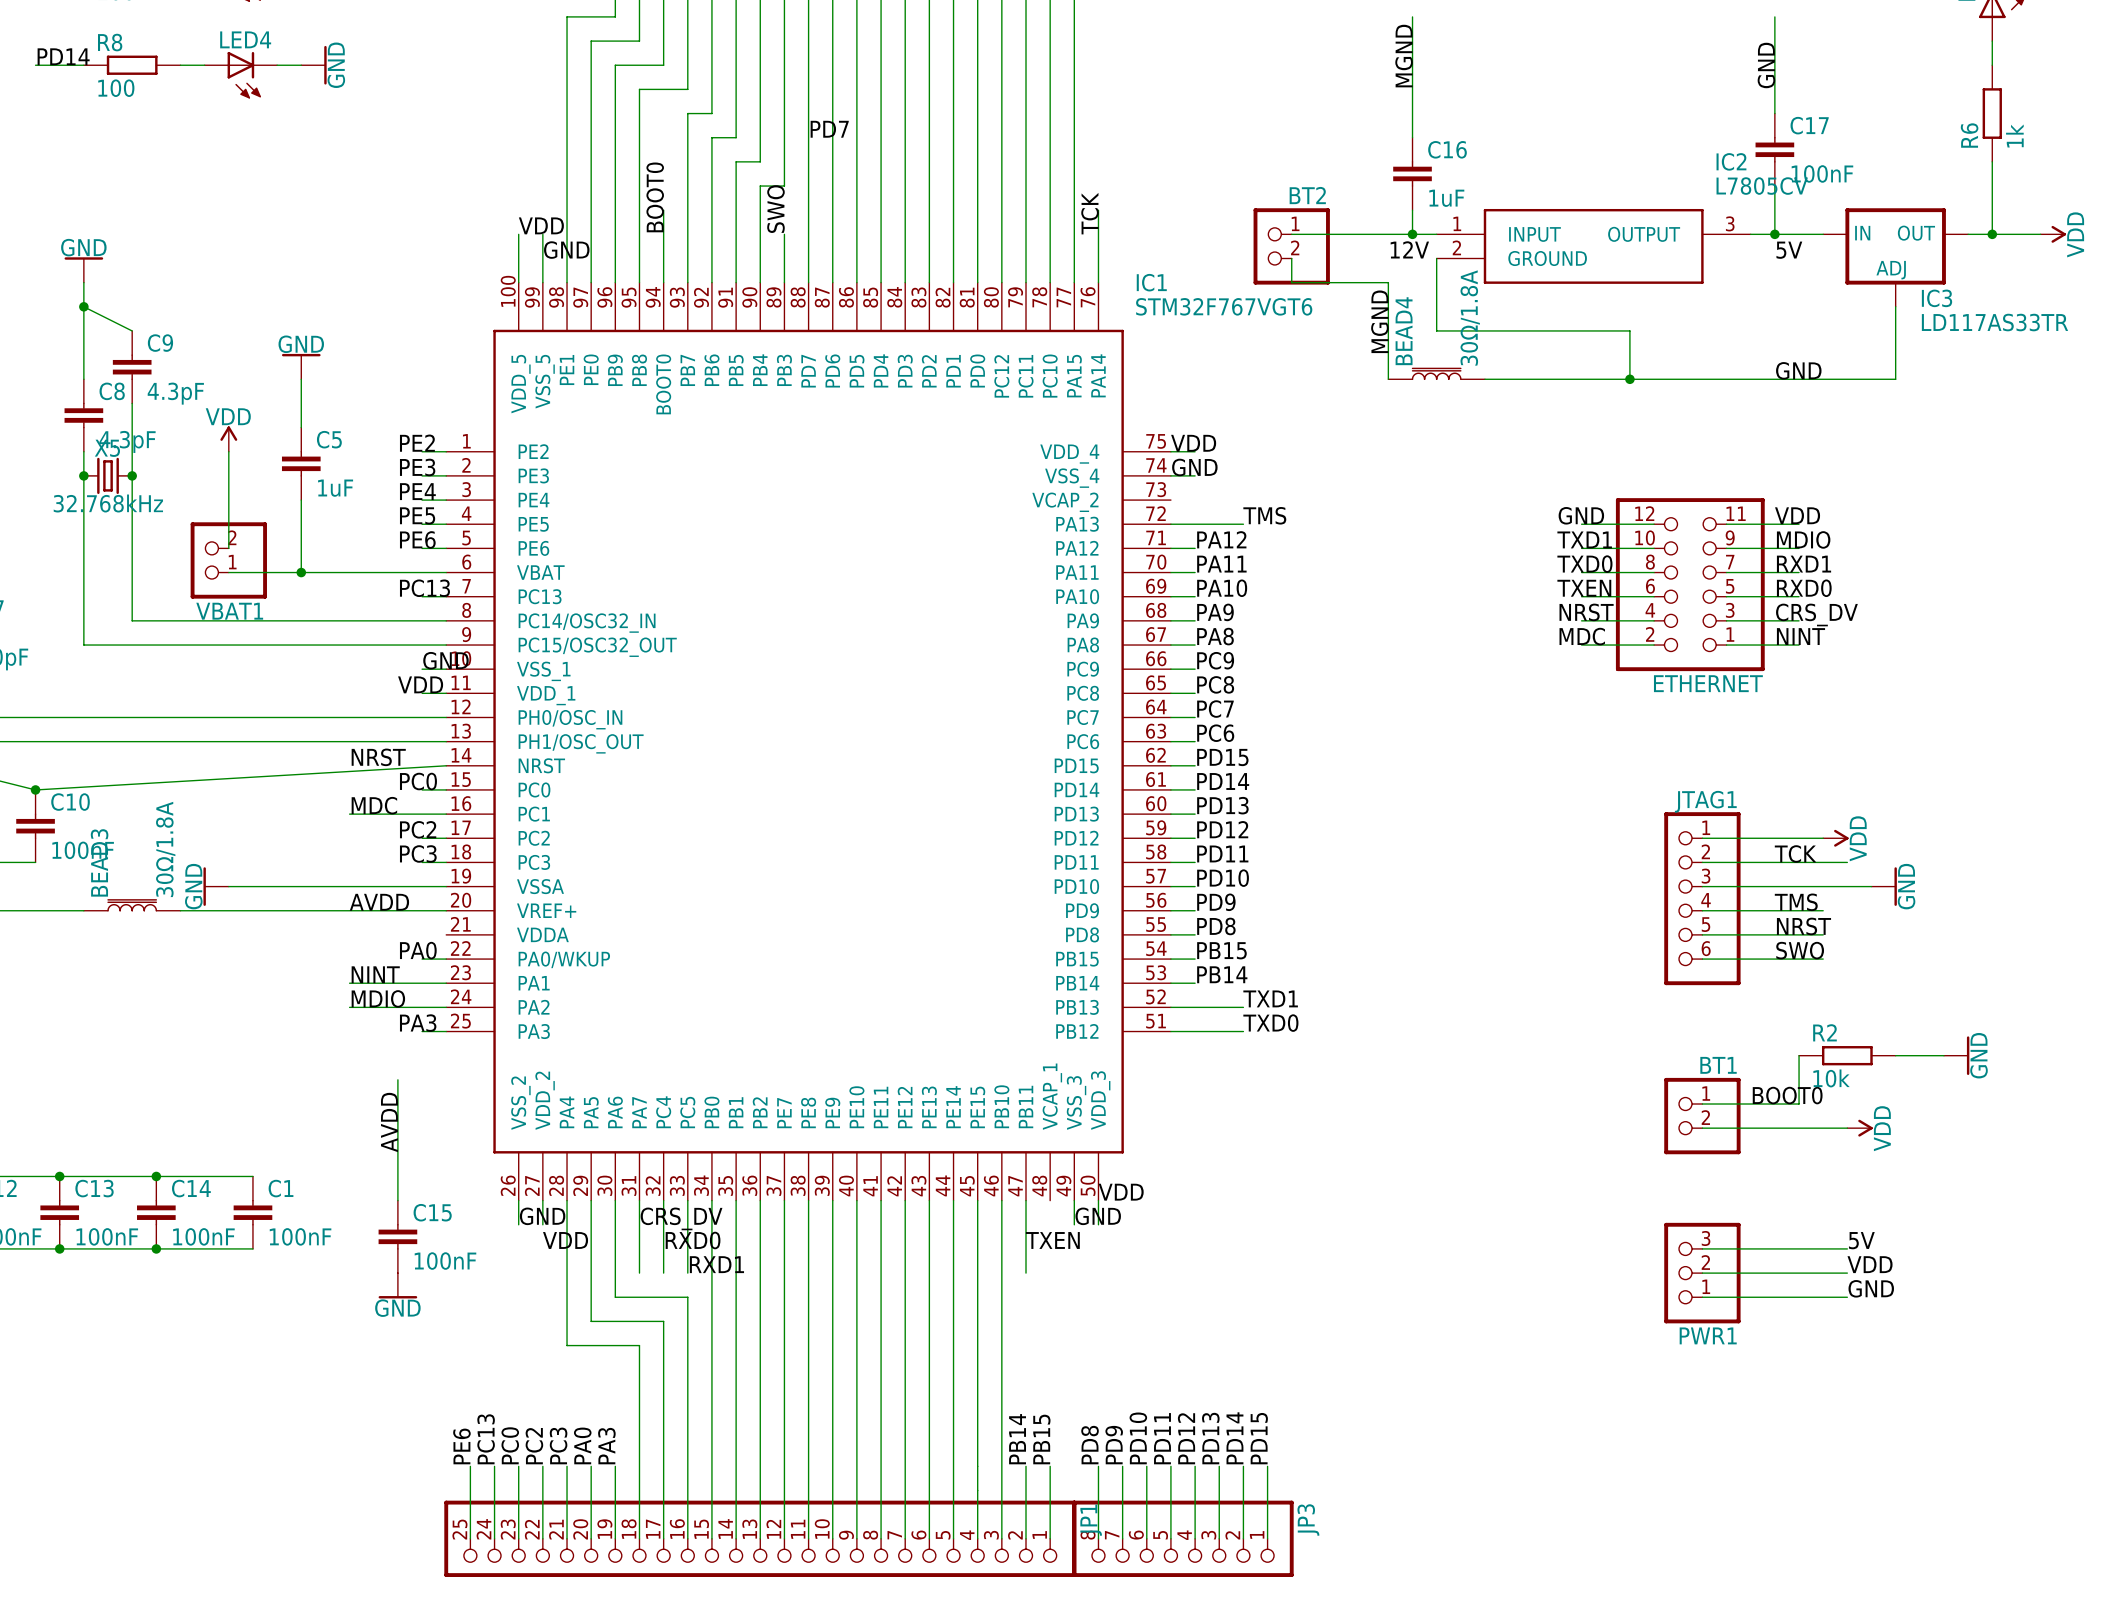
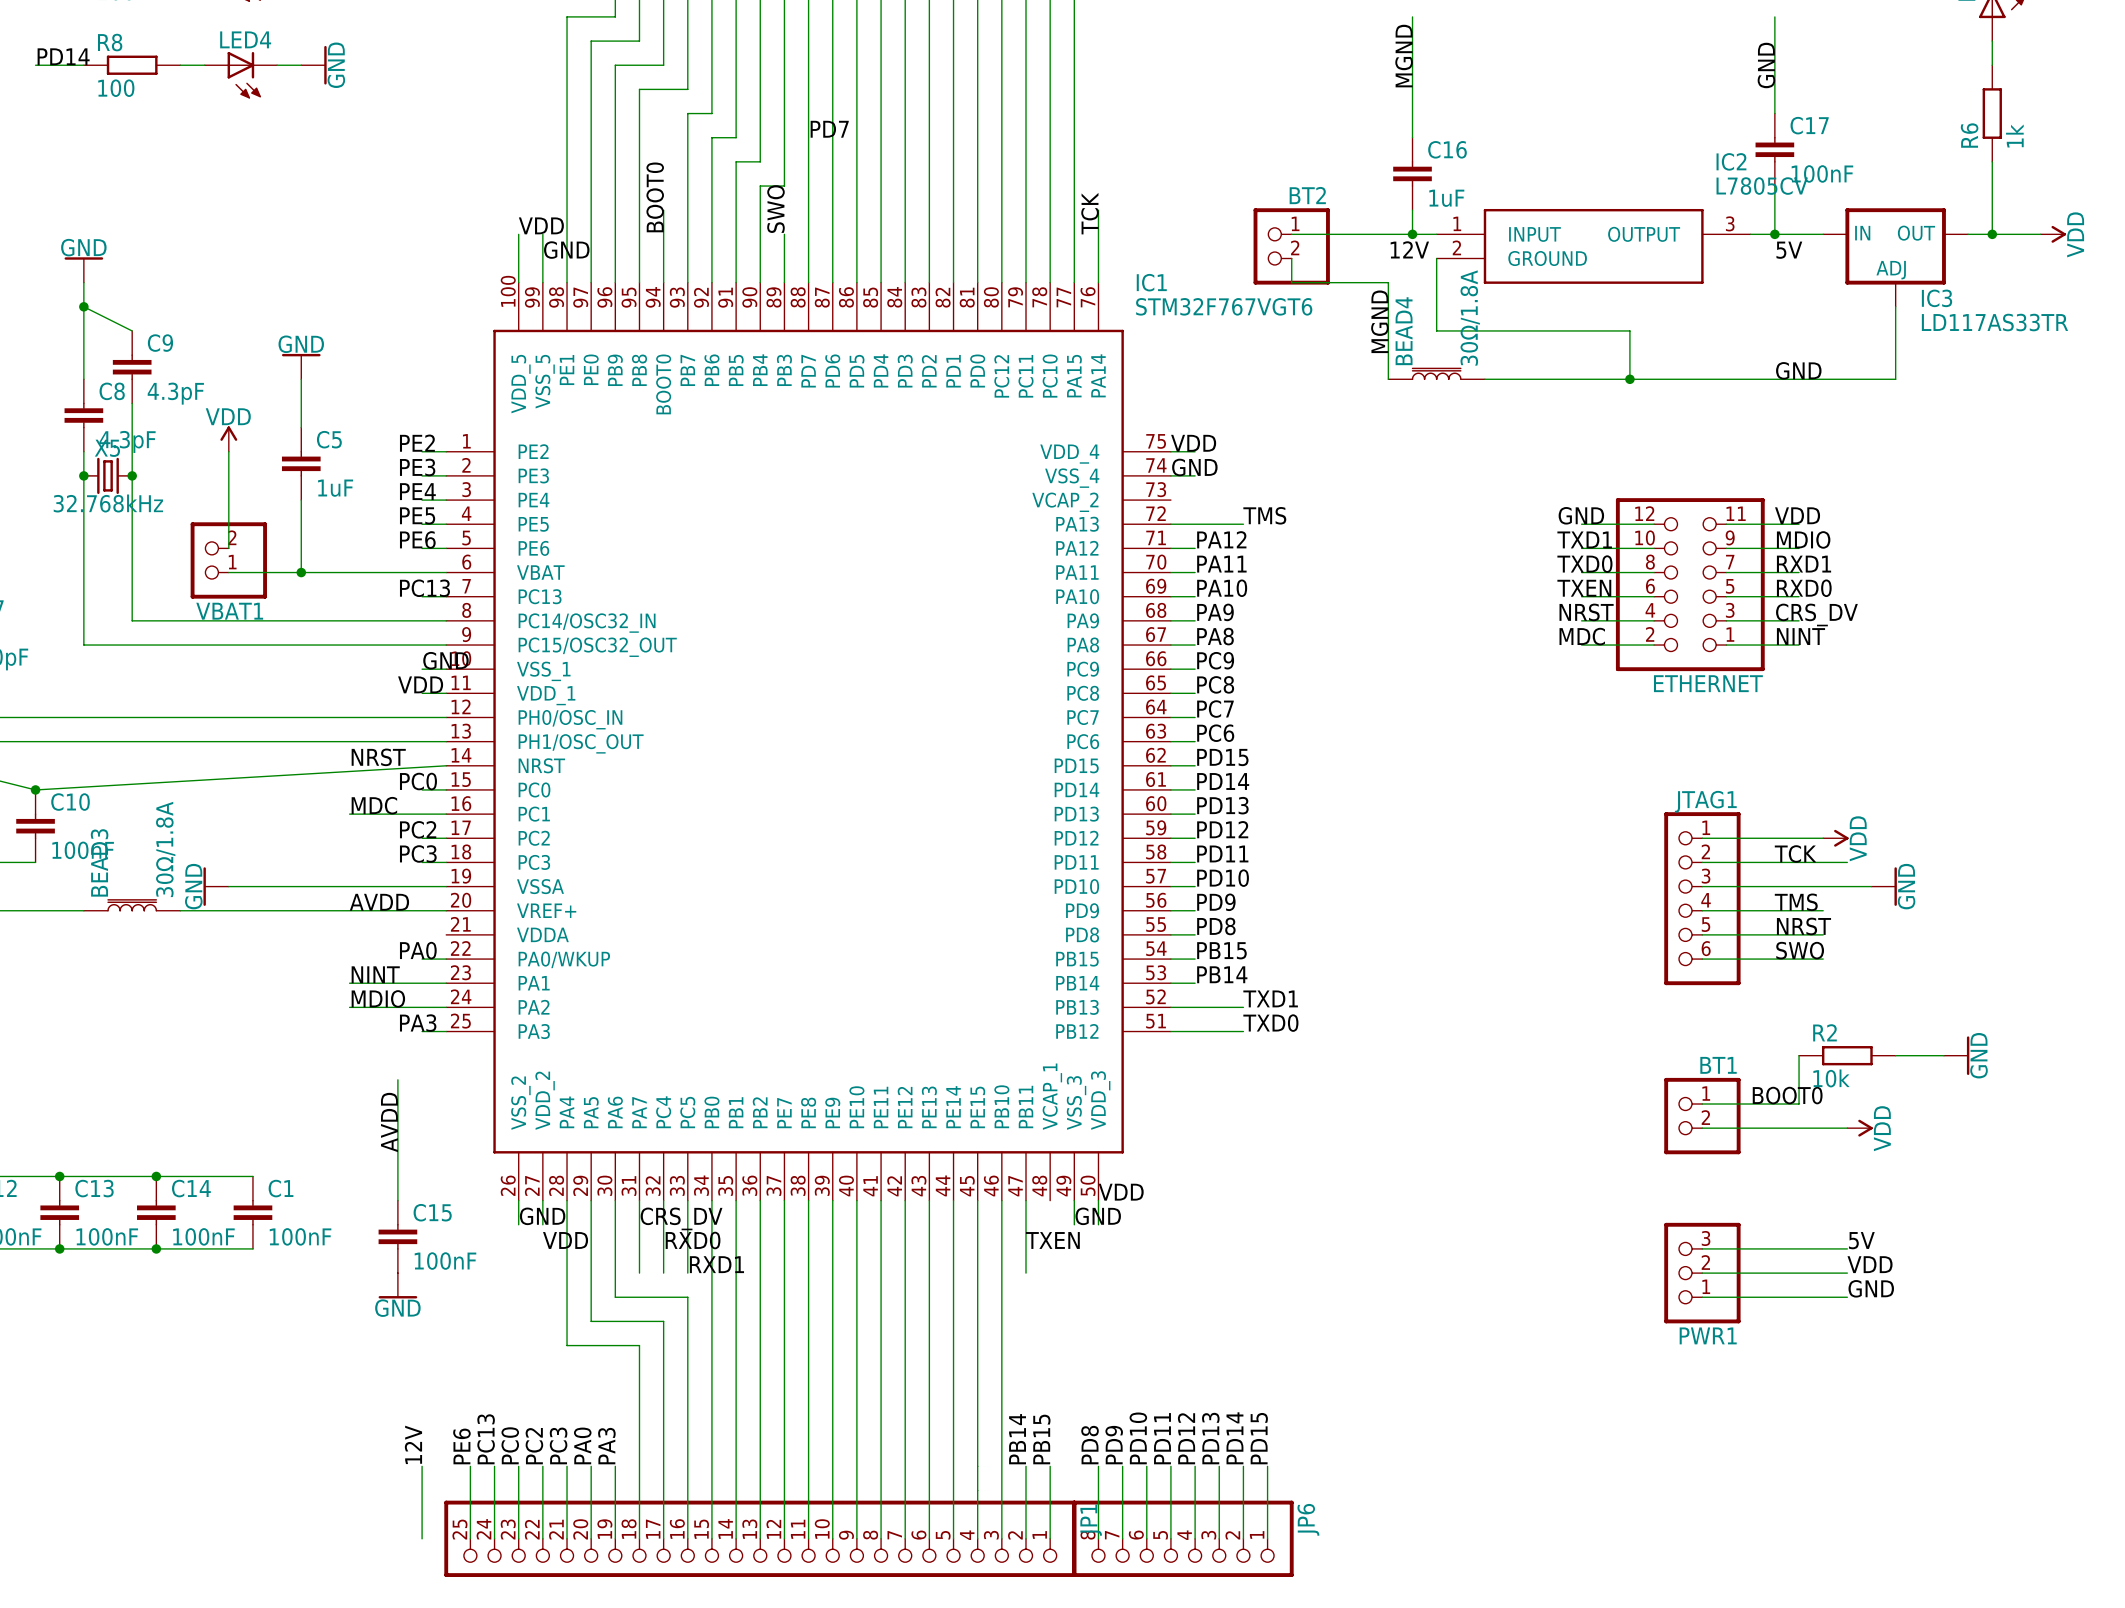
label: none -> 12V (413, 1444)
wire: none -> (422, 1466) (422, 1538)
JP3 name: JP3 (1308, 1519) -> JP6 (1308, 1519)

